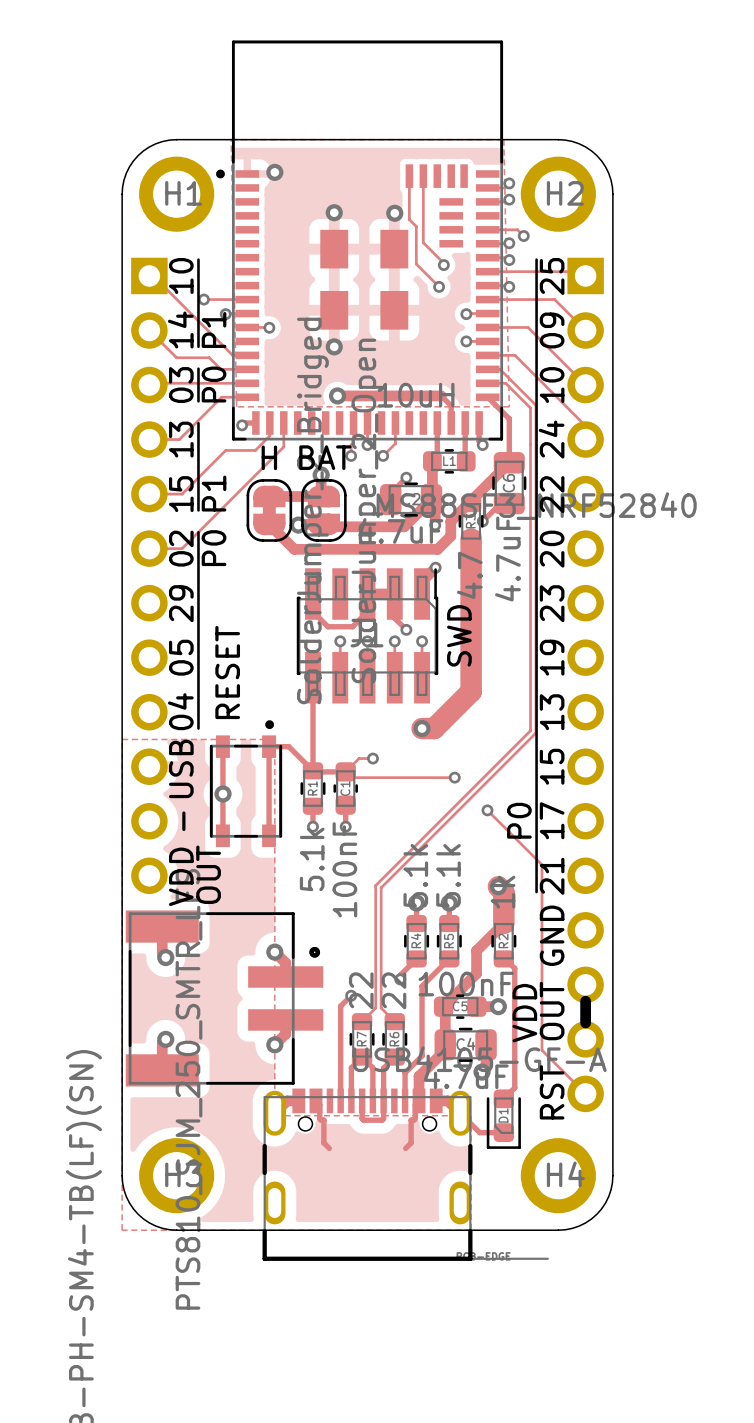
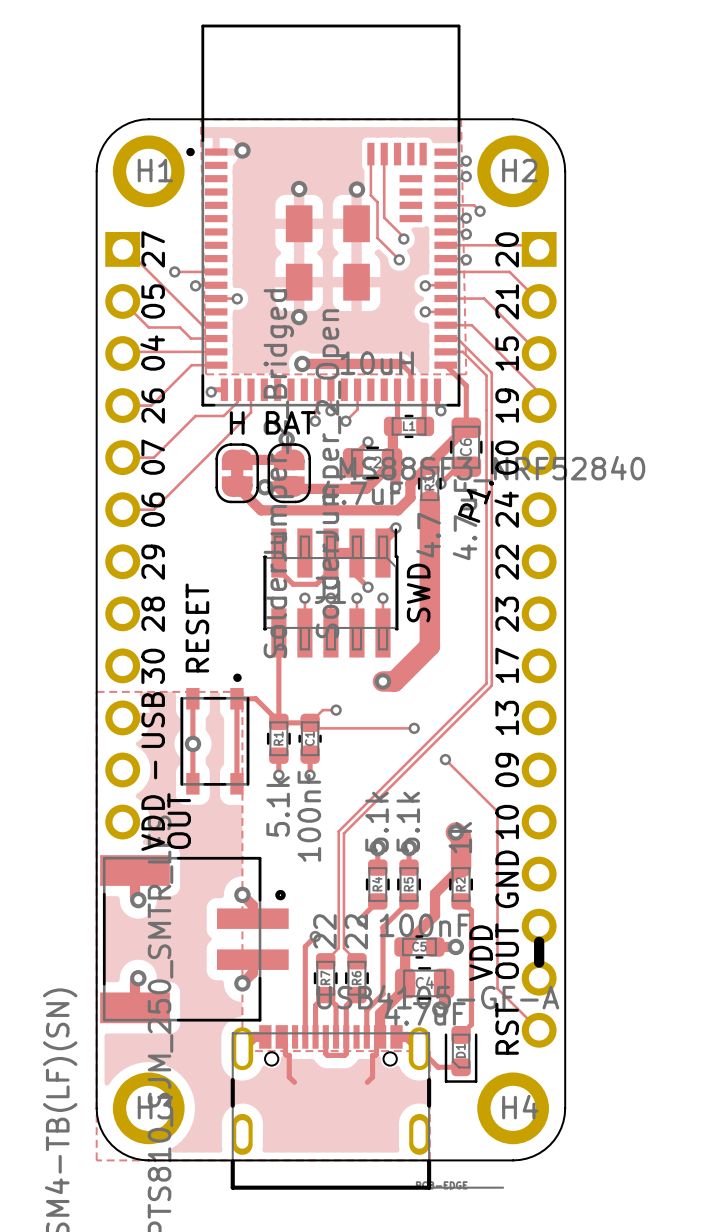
line: (198, 259) (198, 346) -> none
line: (536, 259) (536, 477) -> none
text: 10 (181, 275) -> 27 (153, 249)
text: 25 (552, 276) -> 20 (507, 249)
text: 14 (180, 329) -> 05 (153, 301)
text: P1 (214, 329) -> none
text: 09 (552, 330) -> 21 (507, 301)
line: (198, 368) (198, 401) -> none
text: P0 (214, 384) -> none
text: 03 (181, 385) -> 04 (152, 353)
text: 10 (552, 385) -> 15 (507, 353)
line: (198, 423) (198, 510) -> none
text: 13 (181, 439) -> 26 (153, 406)
text: 24 (551, 439) -> 19 (507, 405)
text: P1 (214, 493) -> none
text: 15 (181, 494) -> 07 (153, 457)
text: 22 (552, 494) -> 00 (507, 457)
line: (536, 510) (536, 892) -> none
line: (198, 532) (198, 728) -> none
text: none -> P1. (475, 501)
text: 02 (181, 548) -> 06 (153, 509)
text: P0 (214, 548) -> none
text: 20 (552, 549) -> 24 (506, 509)
text: 23 (552, 603) -> 22 (507, 562)
text: 05 (181, 657) -> 28 (153, 614)
text: 19 (552, 657) -> 23 (507, 614)
text: 04 (180, 711) -> 30 (153, 666)
text: 13 (552, 712) -> 17 (507, 665)
text: 15 (552, 766) -> 13 (507, 717)
text: P0 (519, 820) -> none
text: 17 (552, 820) -> 09 (507, 769)
text: 21 (552, 876) -> 10 (507, 822)

